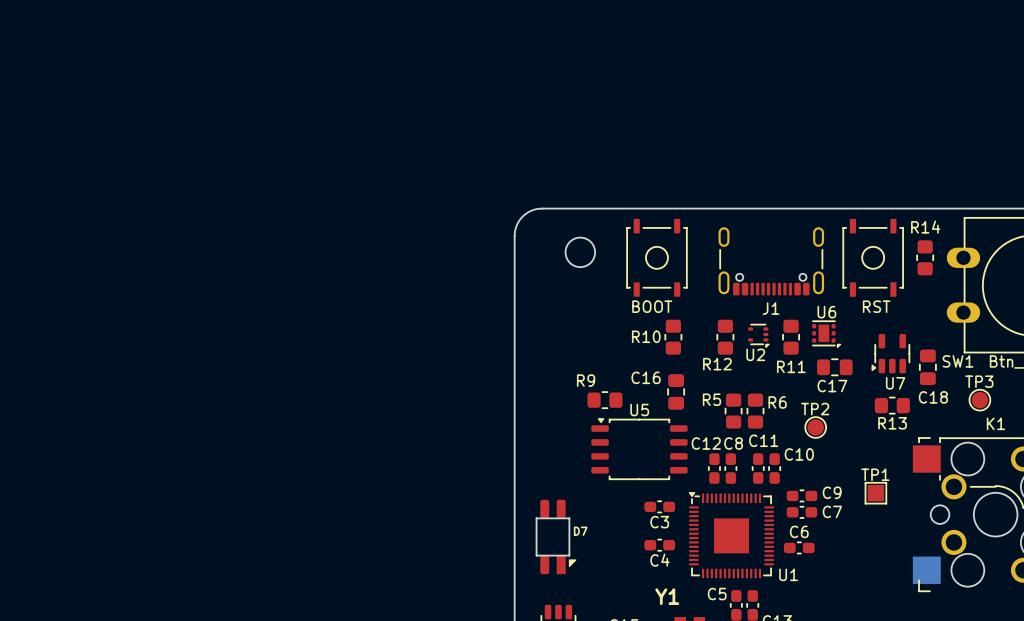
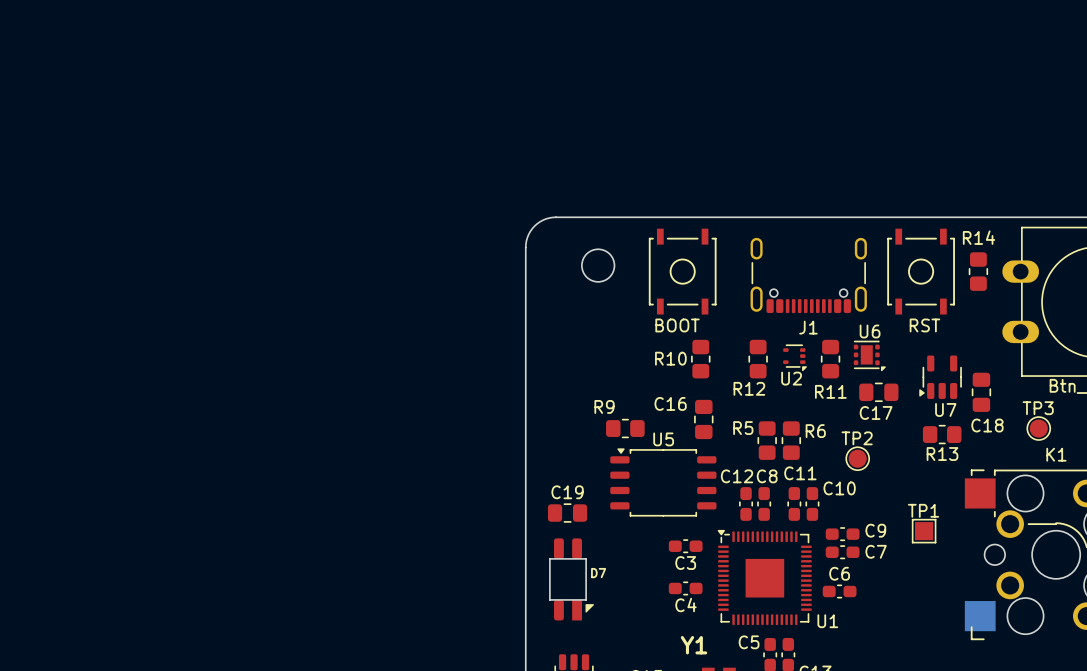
SW1 name: SW1 (958, 361) -> none
C19: none -> (567, 513)

